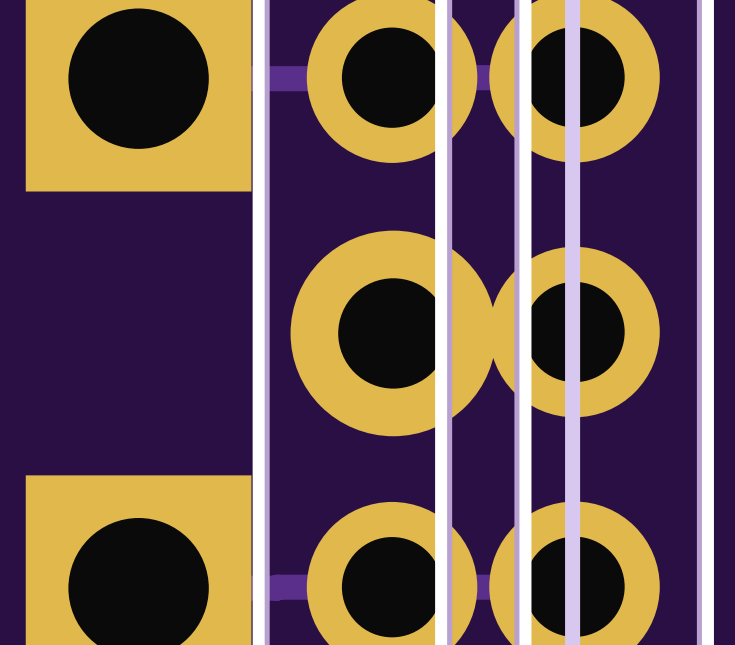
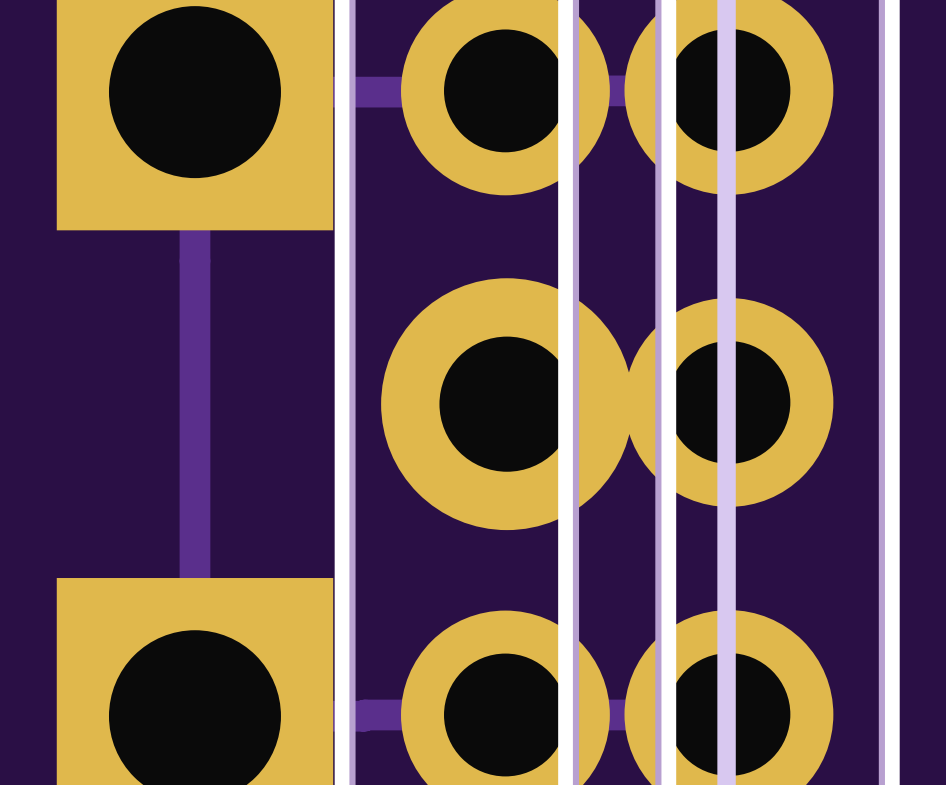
track: none -> (194, 92) (194, 716)

